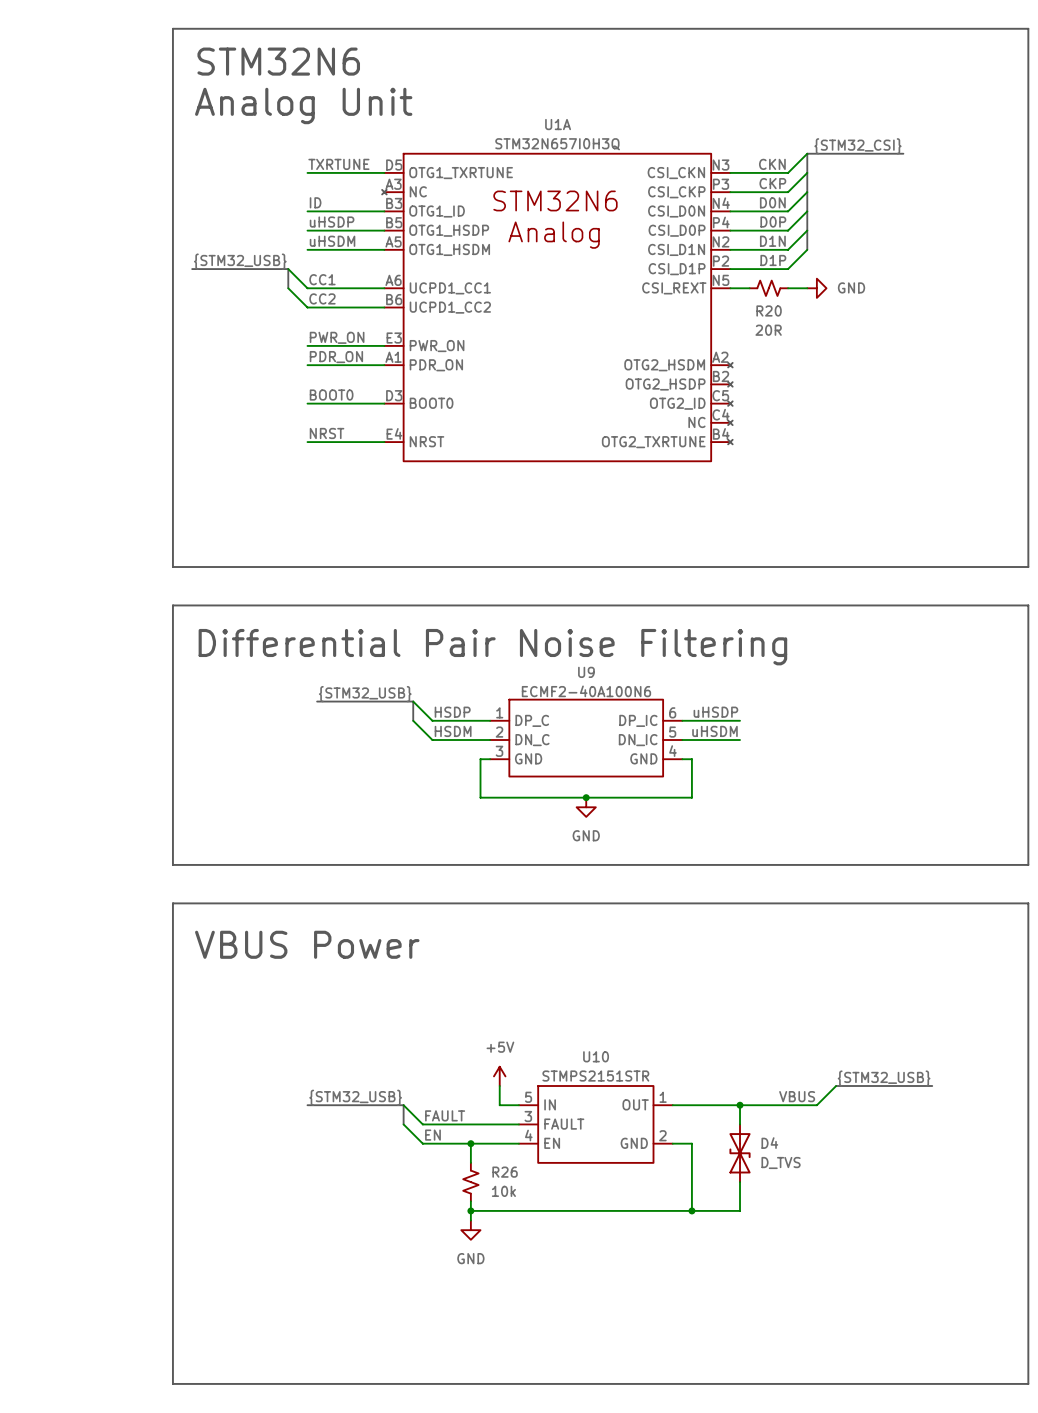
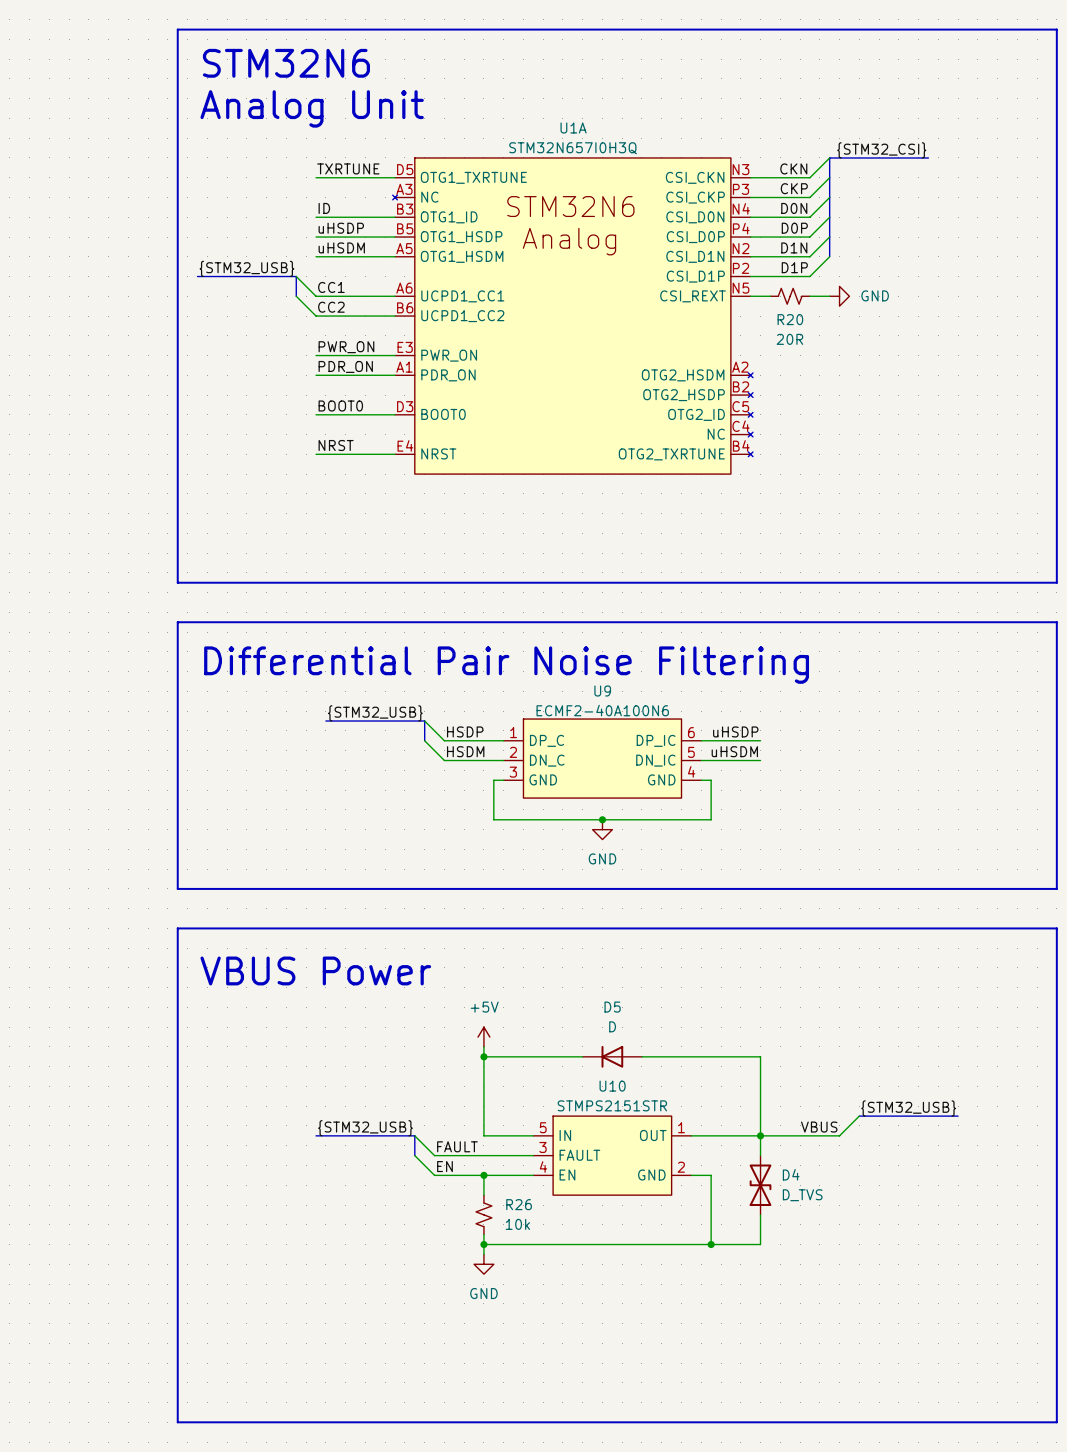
wire: none -> (483, 1056) (582, 1056)
junction: none -> (483, 1056)
D5: none -> D (612, 1056)
wire: none -> (641, 1056) (760, 1056) (760, 1135)
power symbol position: +5V (499, 1076) -> +5V (483, 1037)
wire: (499, 1086) (499, 1105) -> (483, 1046) (483, 1135) (513, 1135)

